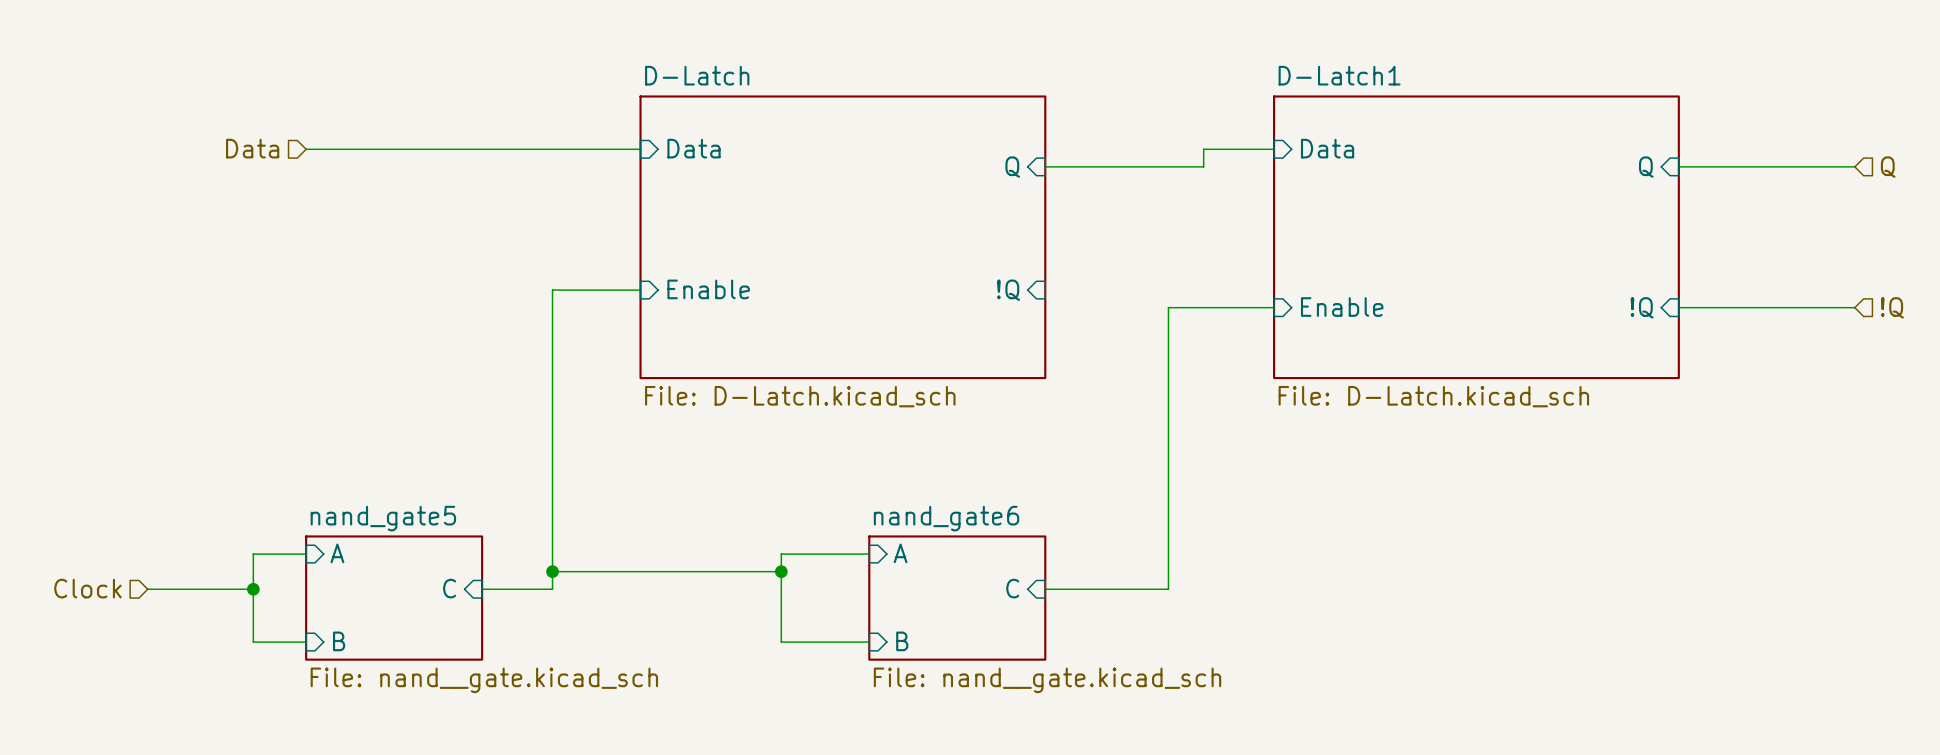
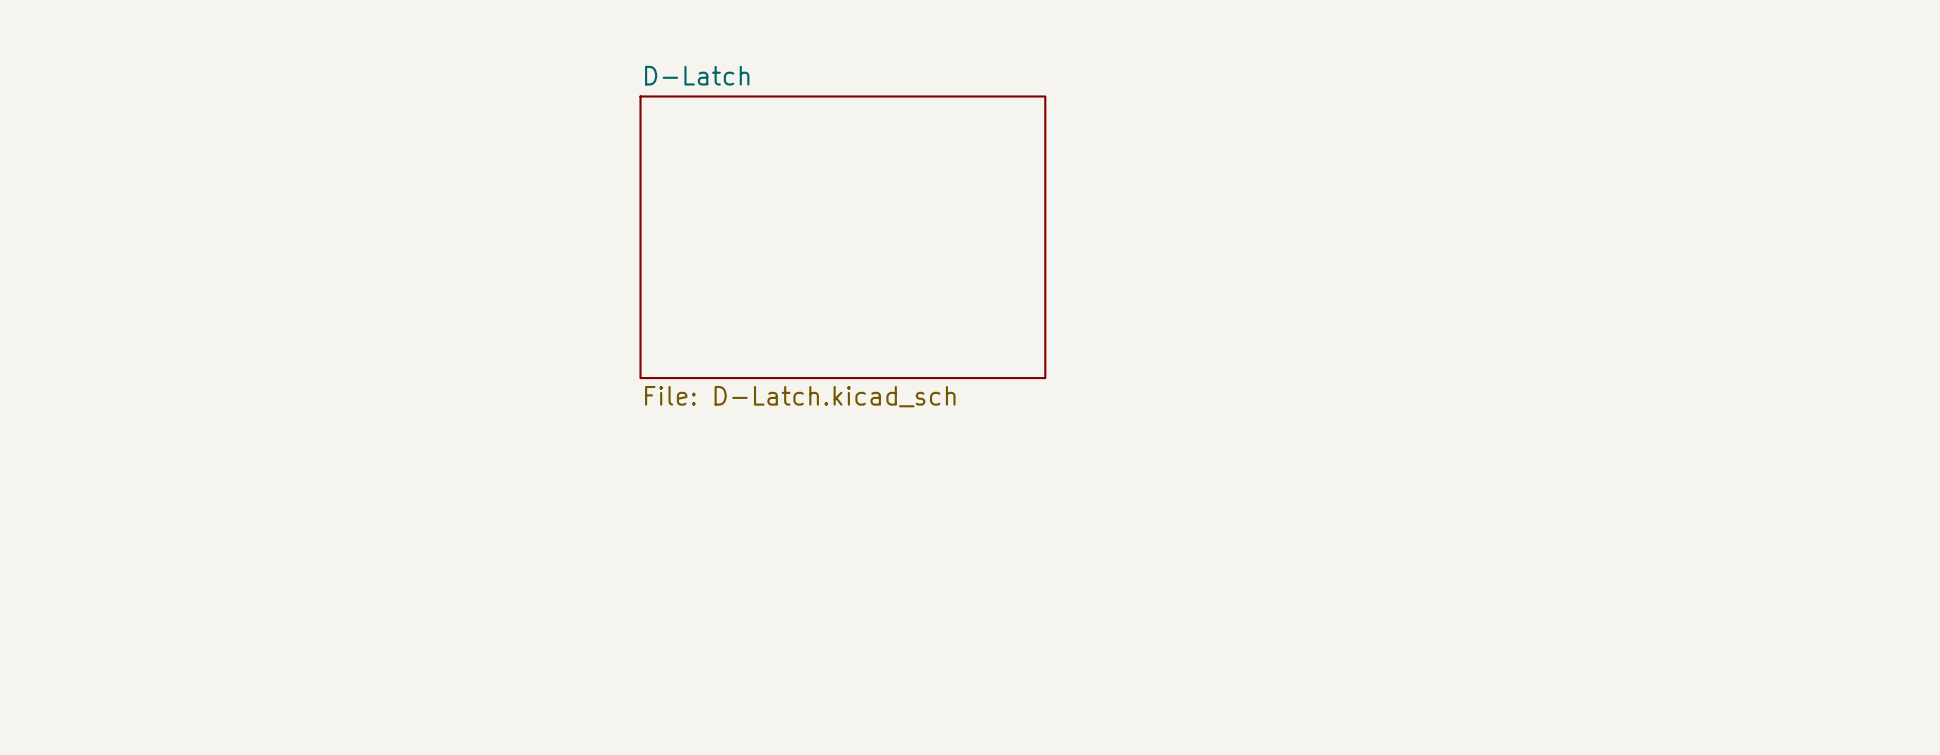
hierarchical label: Data (252, 148) -> none
sheet pin: Data (694, 148) -> none
sheet pin: Data (1327, 148) -> none
wire: (306, 149) (640, 149) -> none
wire: (1274, 149) (1203, 149) (1203, 166) (1045, 166) -> none
wire: (1678, 166) (1854, 166) -> none
sheet pin: Q (1012, 167) -> none
sheet pin: Q (1646, 167) -> none
hierarchical label: Q (1888, 167) -> none
sheet D-Latch1: File: D-Latch.kicad_sch (1476, 237) -> none
sheet pin: Enable (708, 289) -> none
wire: (640, 290) (552, 290) (552, 589) (482, 589) -> none
sheet pin: !Q (1008, 290) -> none
wire: (1274, 307) (1168, 307) (1168, 589) (1045, 589) -> none
sheet pin: Enable (1342, 307) -> none
sheet pin: !Q (1642, 307) -> none
wire: (1678, 307) (1854, 307) -> none
hierarchical label: !Q (1892, 307) -> none
sheet pin: A (337, 553) -> none
sheet pin: A (900, 553) -> none
wire: (306, 554) (253, 554) (253, 642) (306, 642) -> none
wire: (869, 554) (781, 554) (781, 642) (869, 642) -> none
wire: (552, 571) (781, 571) -> none
junction: (552, 571) -> none
junction: (781, 571) -> none
hierarchical label: Clock (87, 588) -> none
sheet pin: C (449, 588) -> none
sheet pin: C (1012, 588) -> none
wire: (147, 589) (253, 589) -> none
junction: (253, 589) -> none
sheet nand_gate5: File: nand__gate.kicad_sch (394, 598) -> none
sheet nand_gate6: File: nand__gate.kicad_sch (957, 598) -> none
sheet pin: B (339, 641) -> none
sheet pin: B (902, 641) -> none

